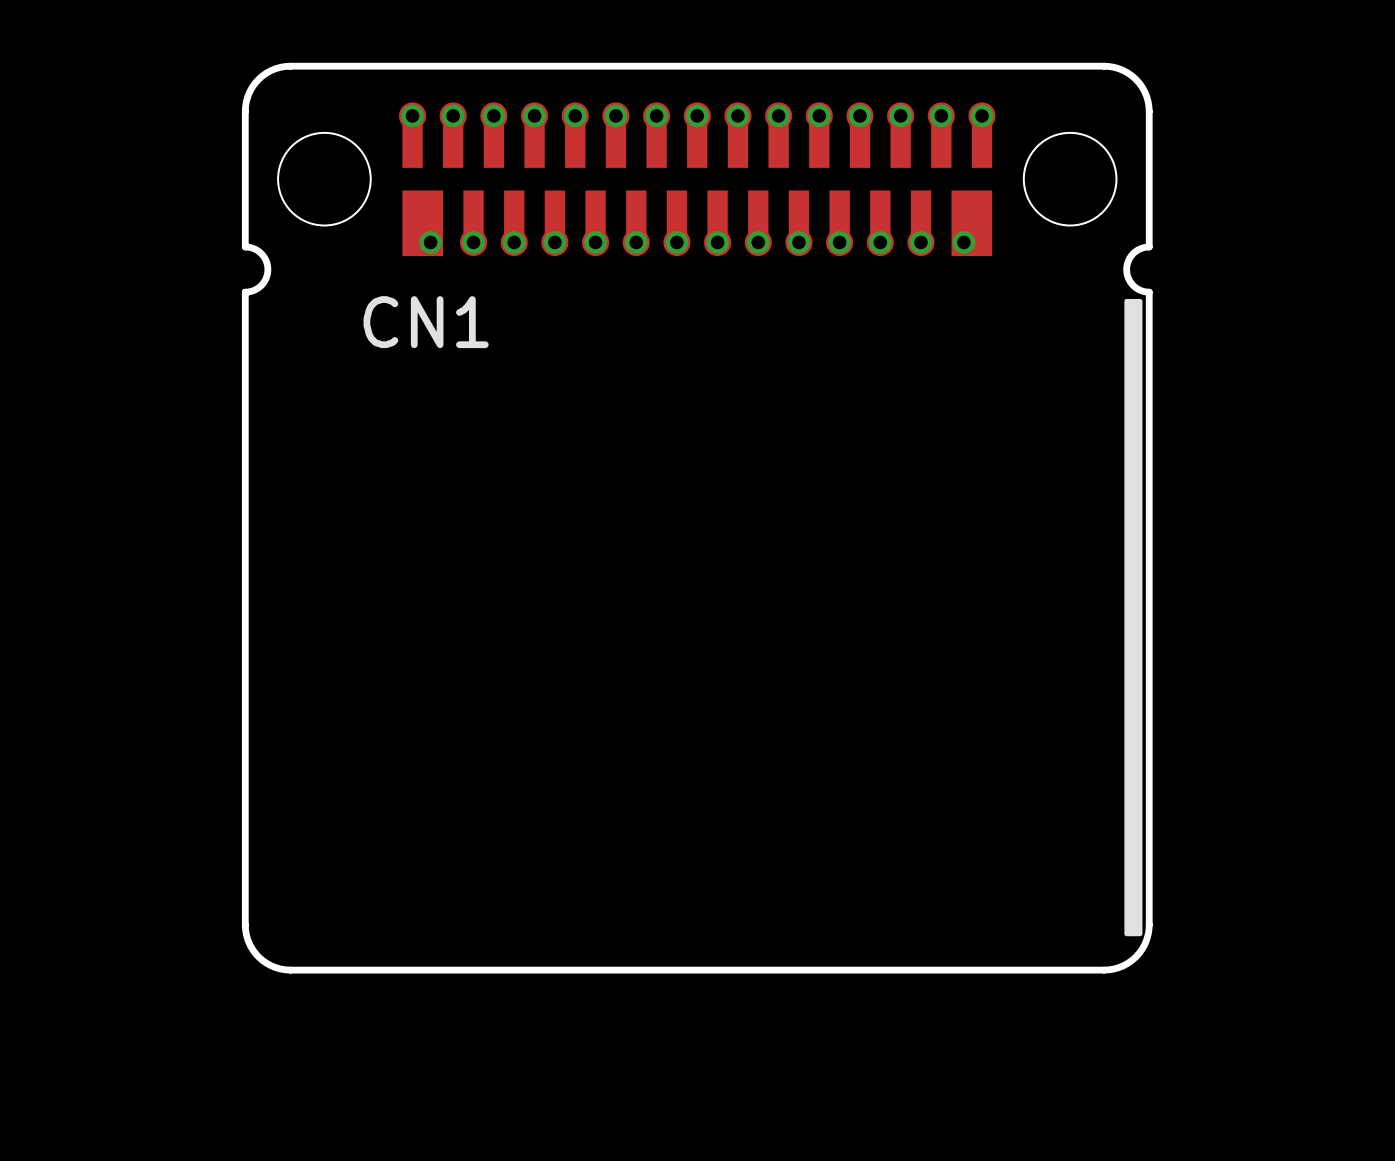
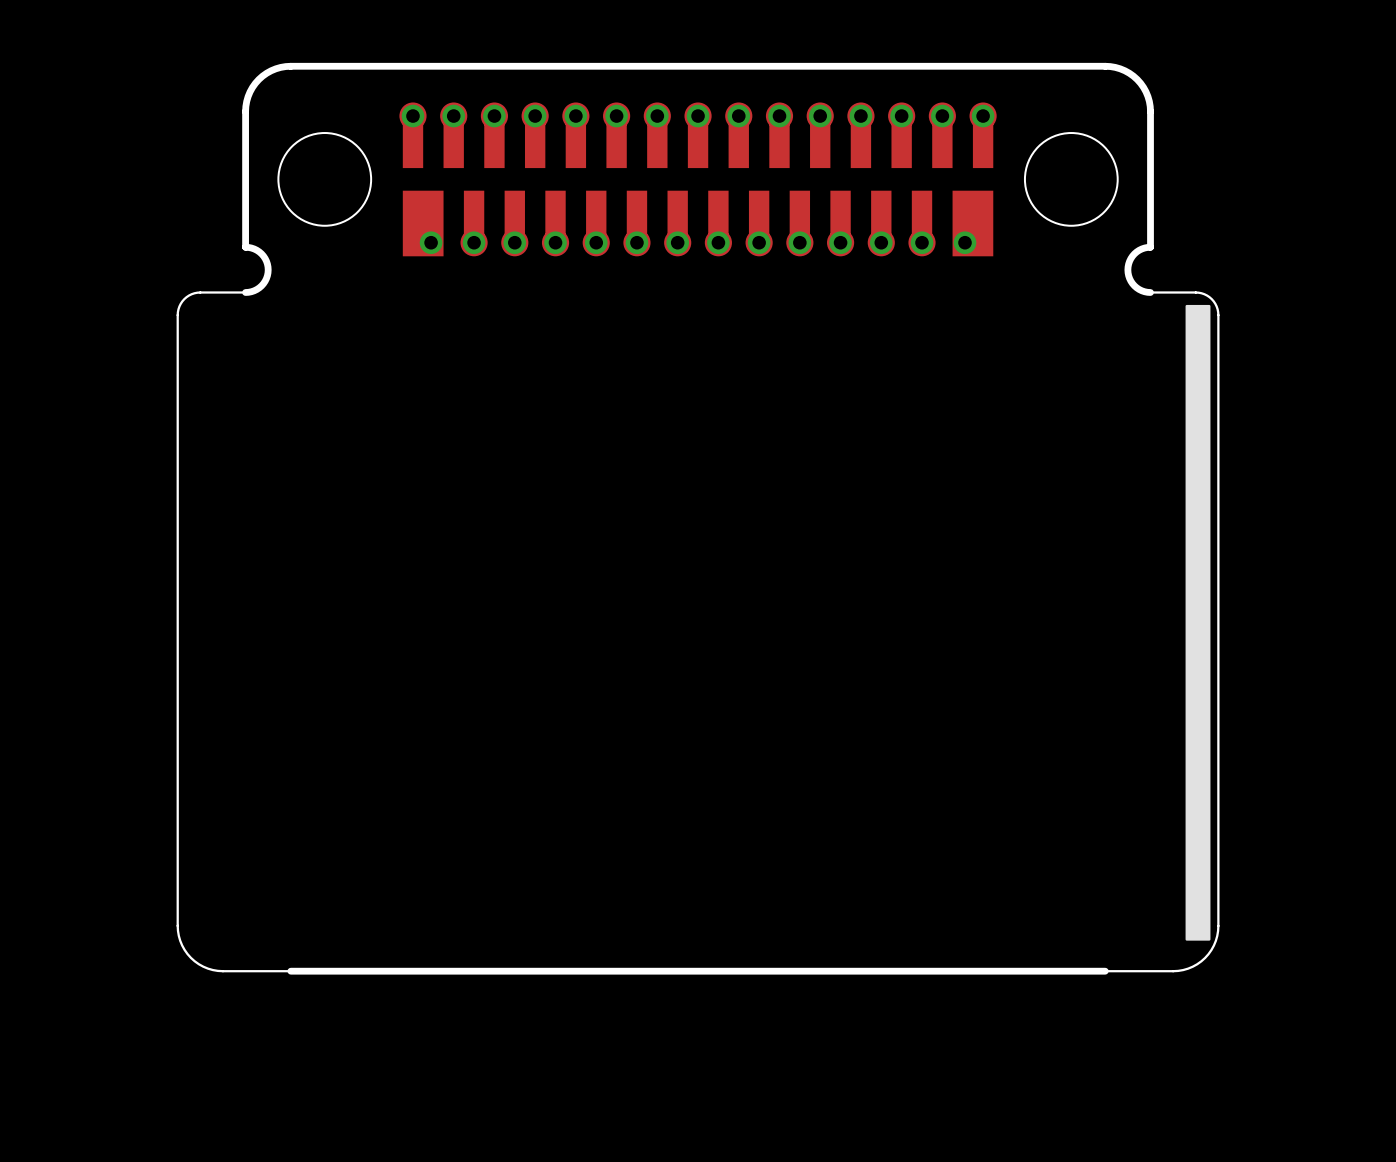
board edge: (245, 292) (245, 929) (252, 948) (262, 960) (275, 967) (290, 970) -> (245, 292) (194, 293) (182, 301) (177, 312) (177, 930) (180, 940) (187, 954) (198, 964) (207, 968) (222, 971) (290, 971)
board edge: (1149, 292) (1148, 929) (1142, 948) (1132, 960) (1118, 967) (1104, 970) -> (1150, 292) (1201, 293) (1213, 301) (1218, 312) (1218, 931) (1215, 940) (1208, 954) (1201, 961) (1188, 968) (1173, 971) (1105, 971)
drawing: [1124, 298, 1143, 937] -> none
drawing: none -> [1185, 304, 1211, 941]
CN1 name: CN1 (426, 322) -> none

